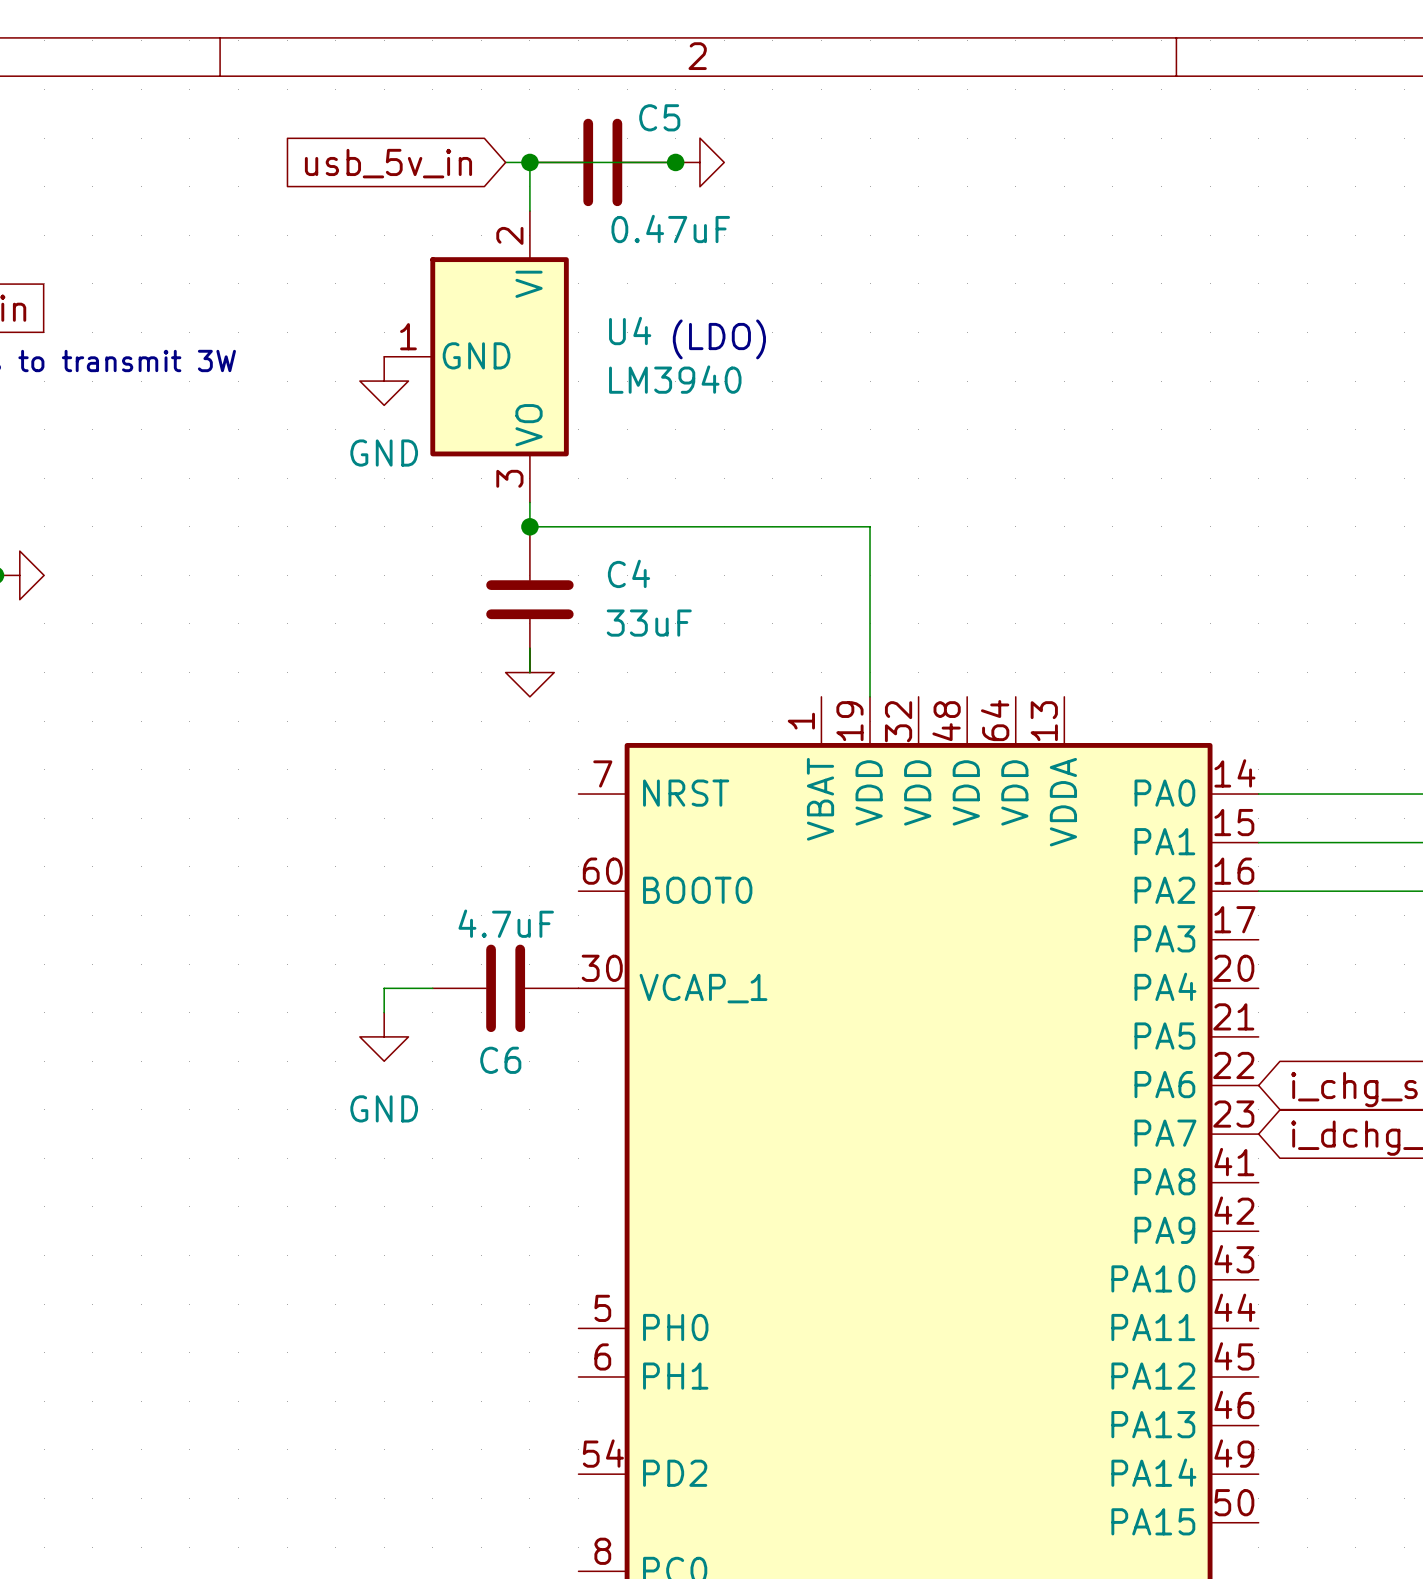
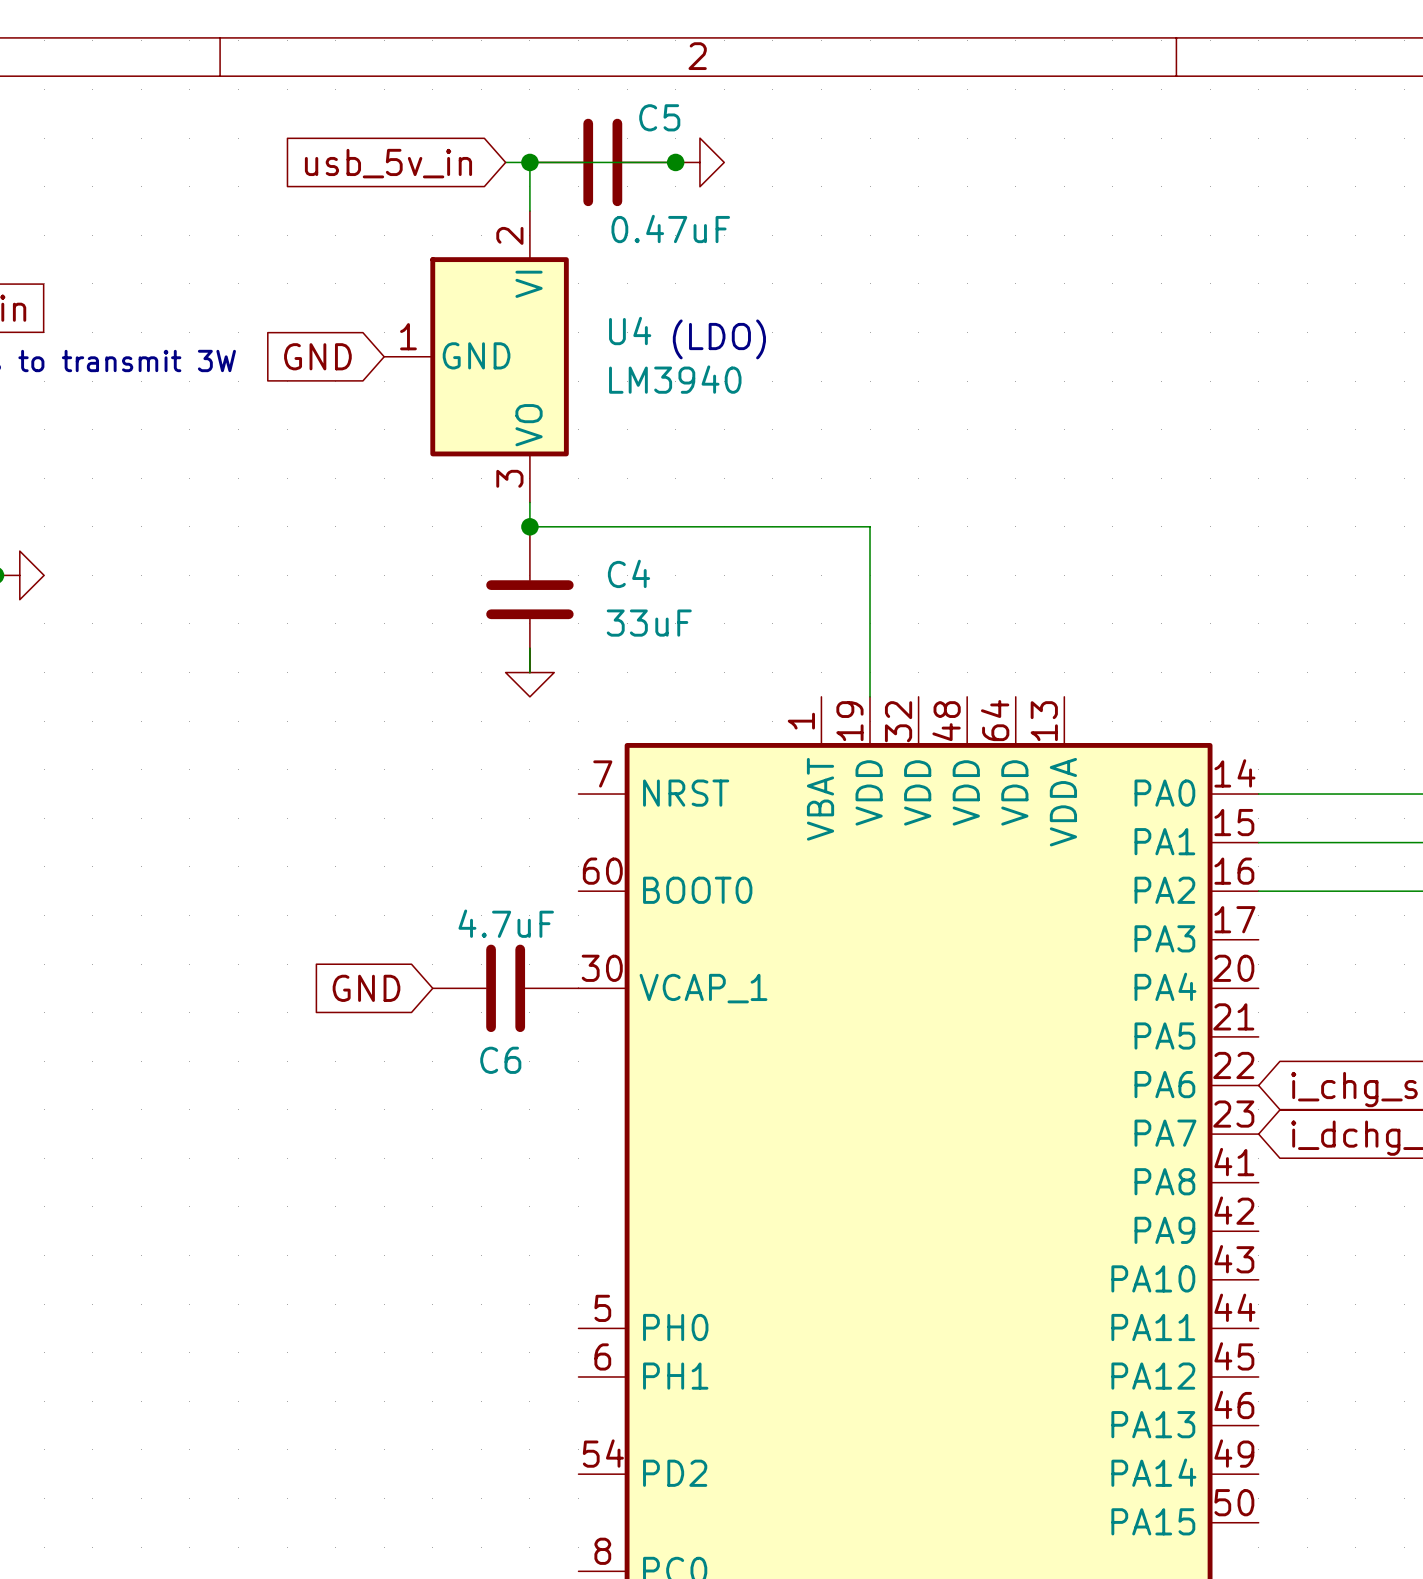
global label: none -> GND (317, 356)
power symbol: GND (384, 381) -> none
global label: none -> GND (366, 988)
wire: (432, 988) (384, 988) (384, 1012) -> none
power symbol: GND (384, 1036) -> none

